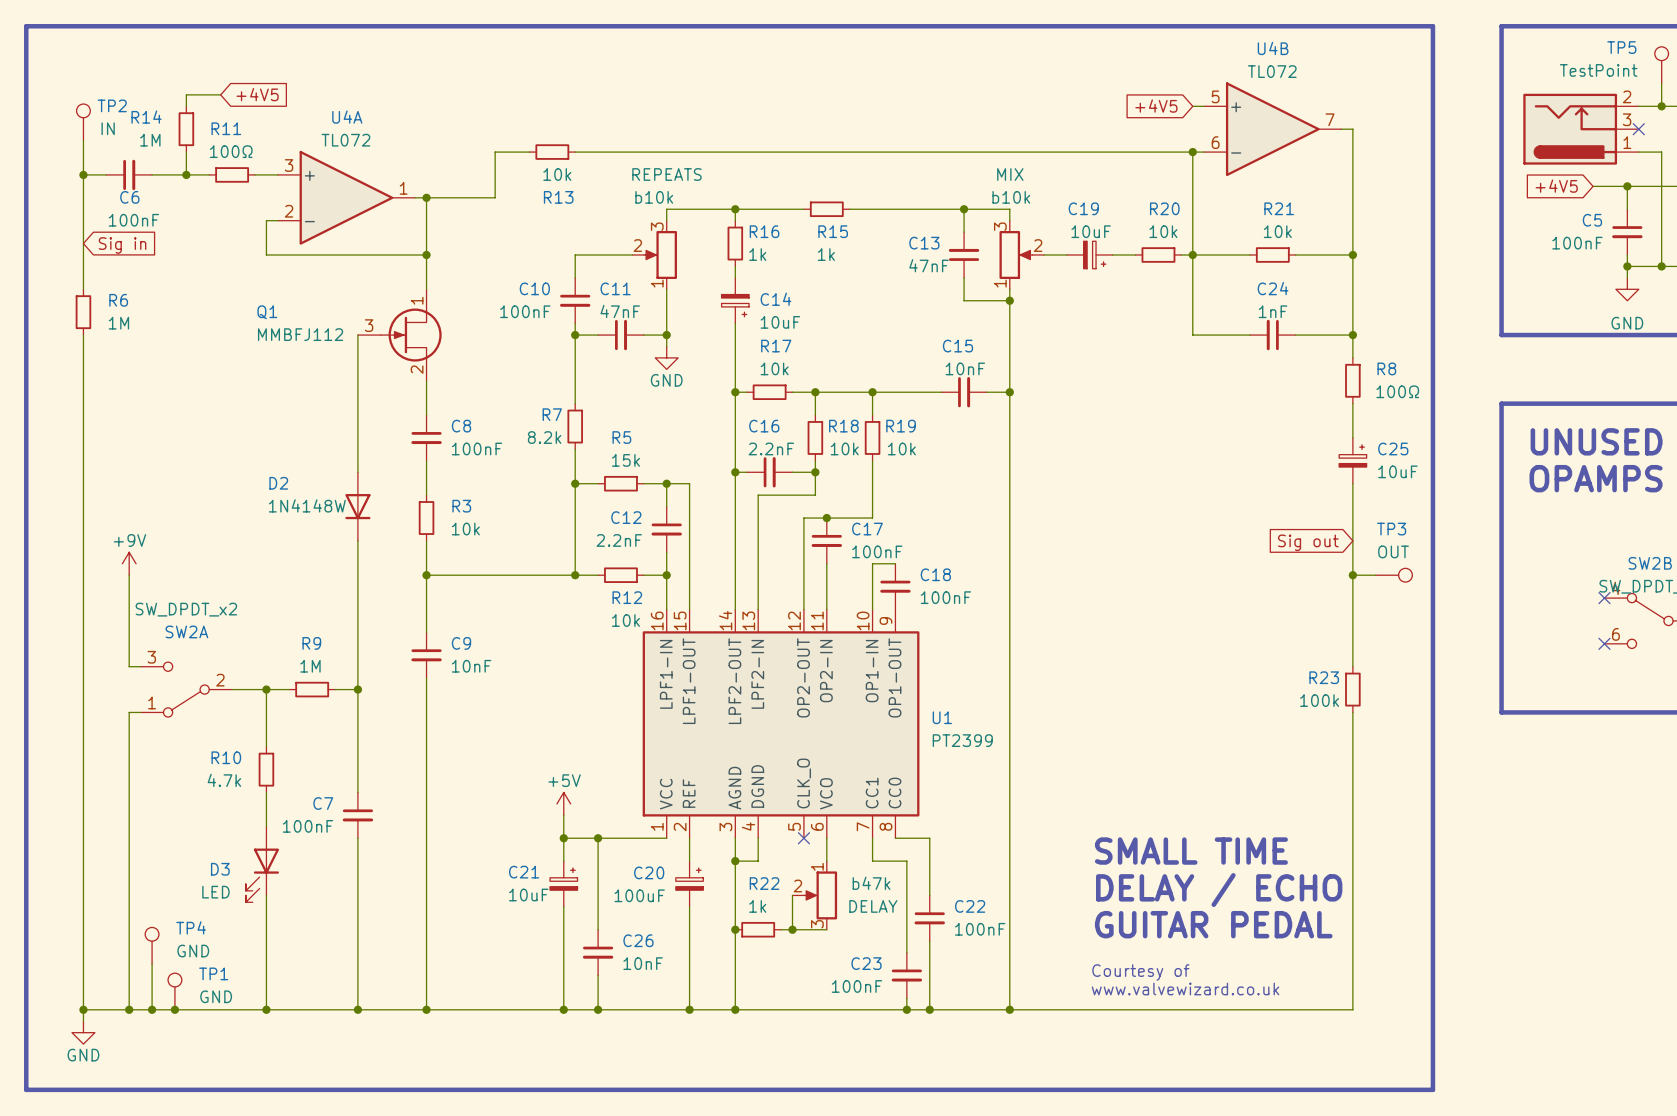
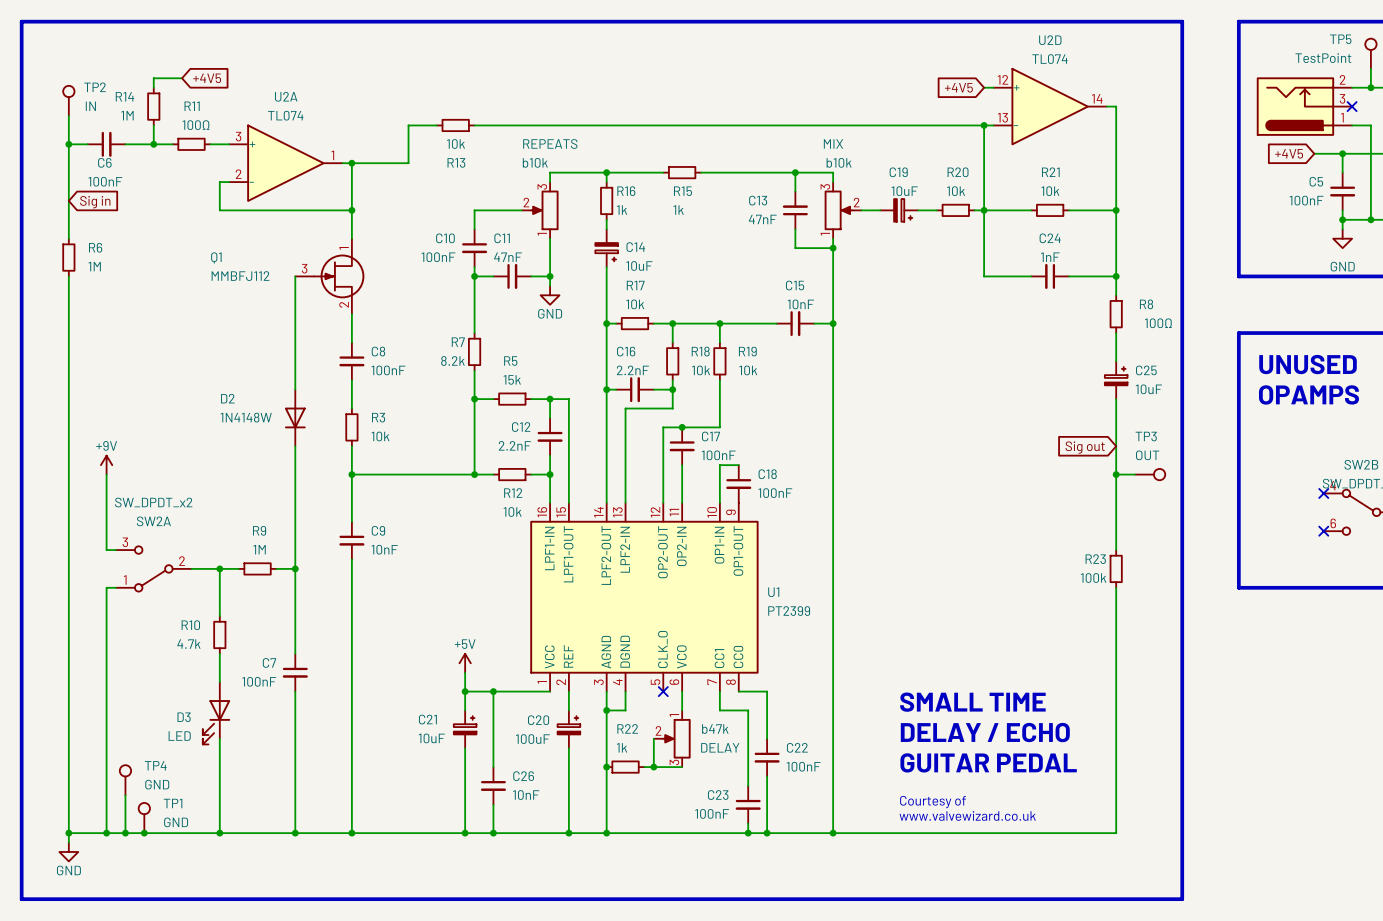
U4B name: U4B (1273, 48) -> U2D (1050, 40)
U4B value: TL072 (1272, 71) -> TL074 (1050, 59)
U4B pin number: 5 (1215, 96) -> 12 (1002, 79)
U4A name: U4A (347, 117) -> U2A (286, 96)
U4B pin number: 7 (1330, 119) -> 14 (1097, 98)
U4A value: TL072 (345, 140) -> TL074 (285, 115)
U4B pin number: 6 (1215, 142) -> 13 (1002, 117)

